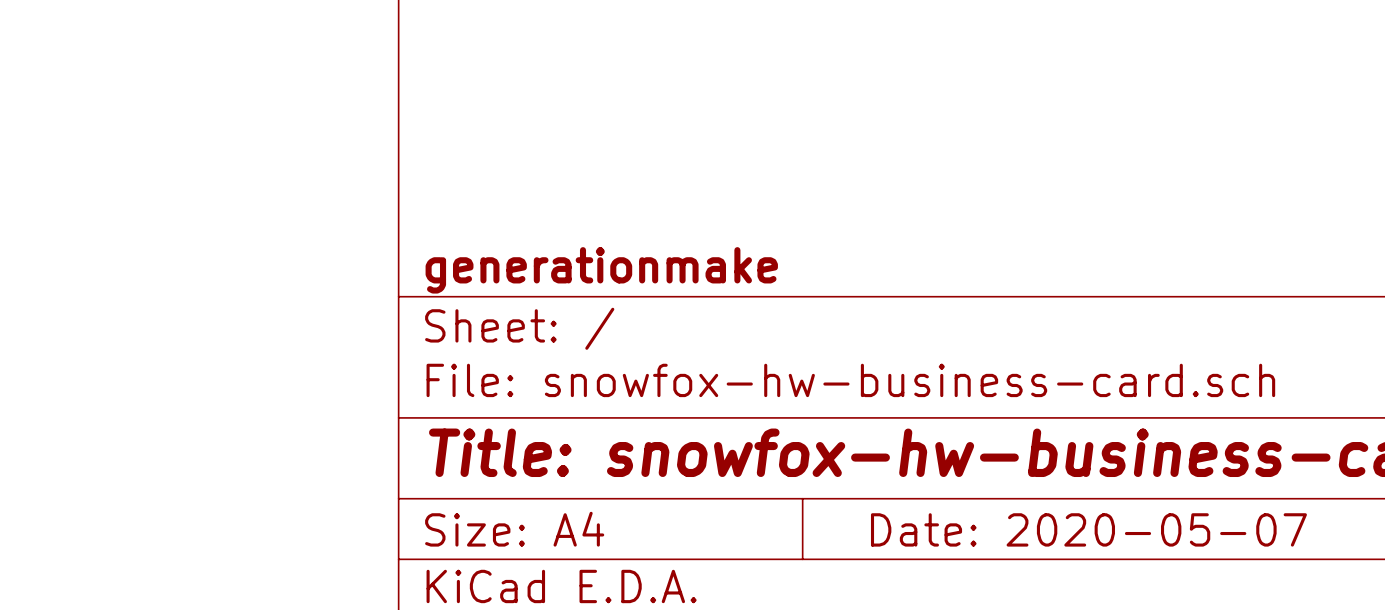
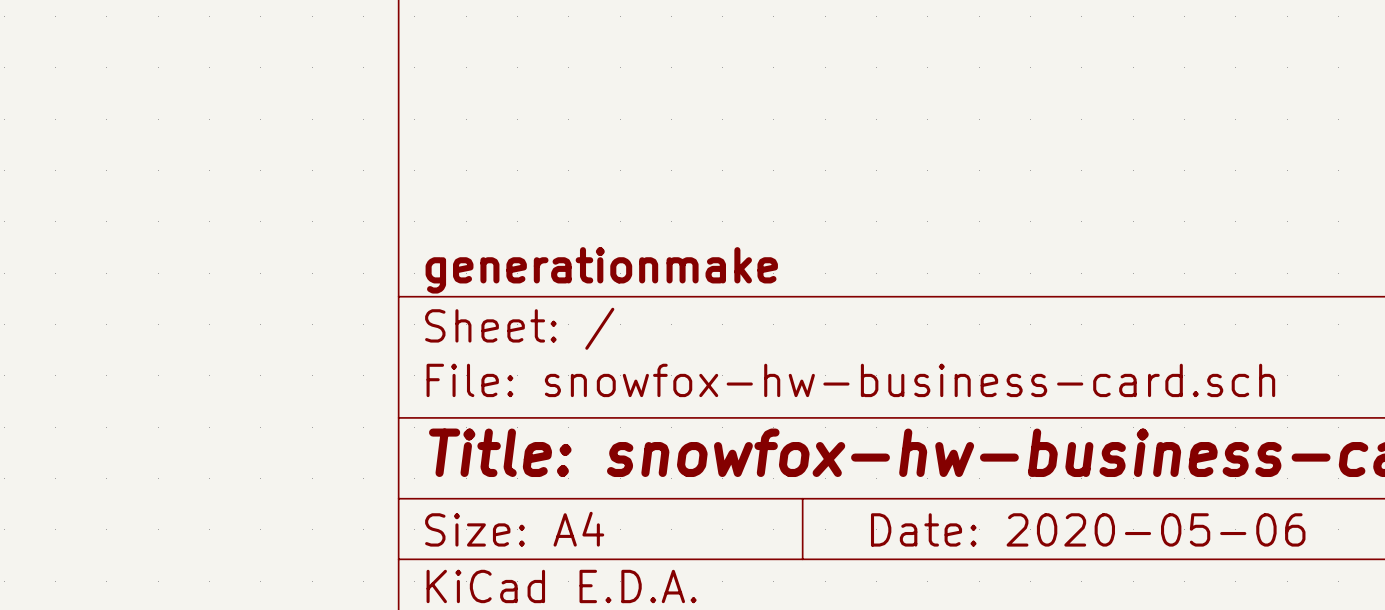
title block: Date: 2020-05-07 (1088, 529) -> Date: 2020-05-06 (1088, 529)

